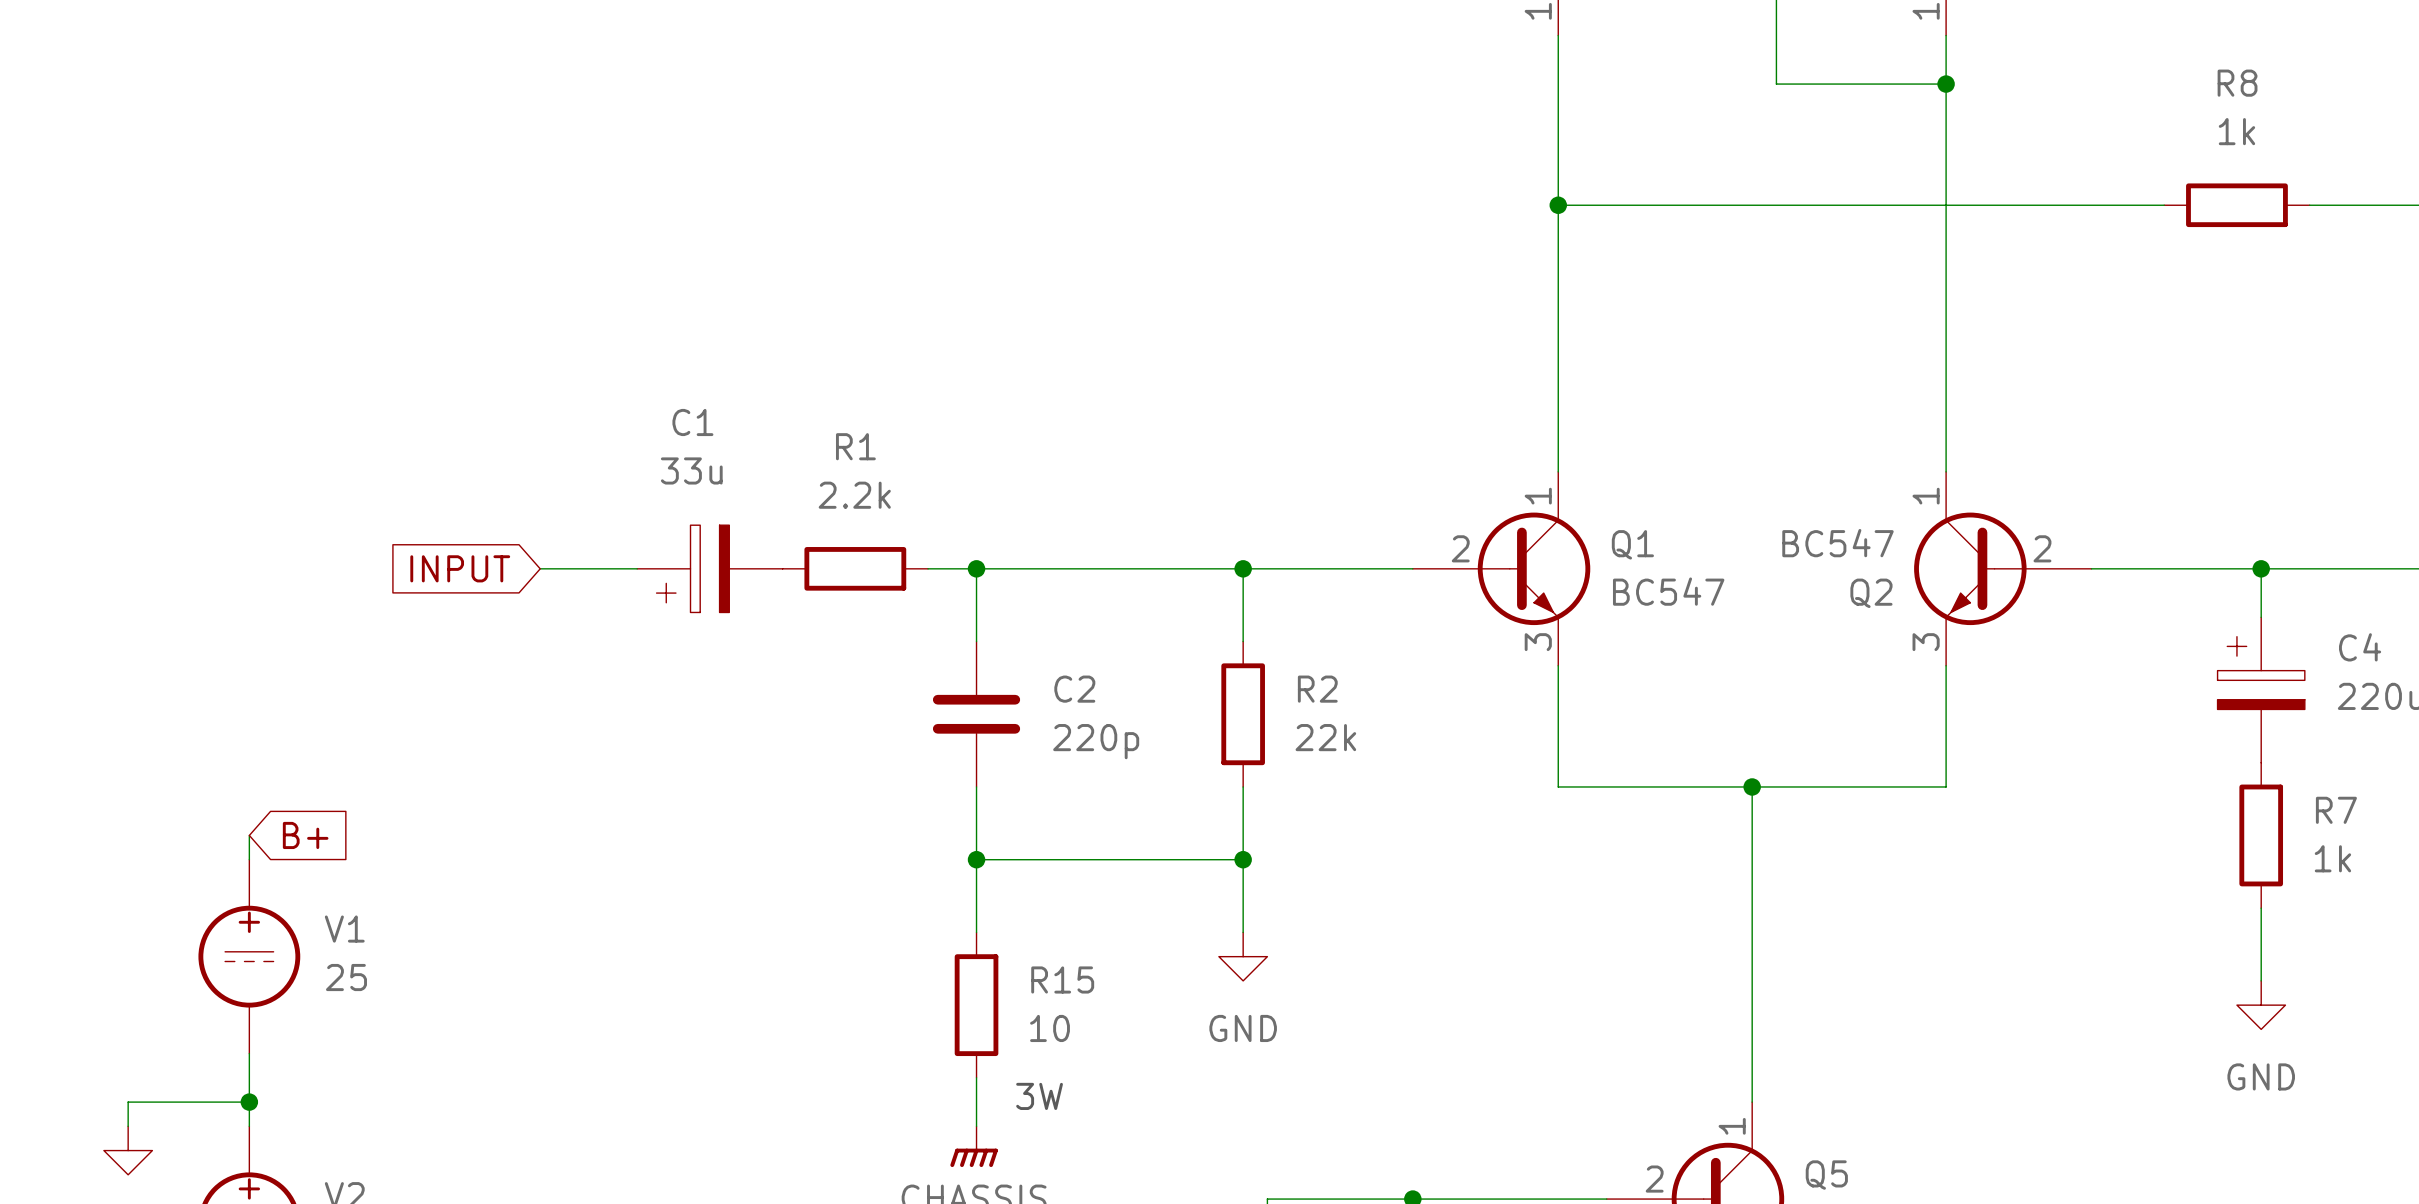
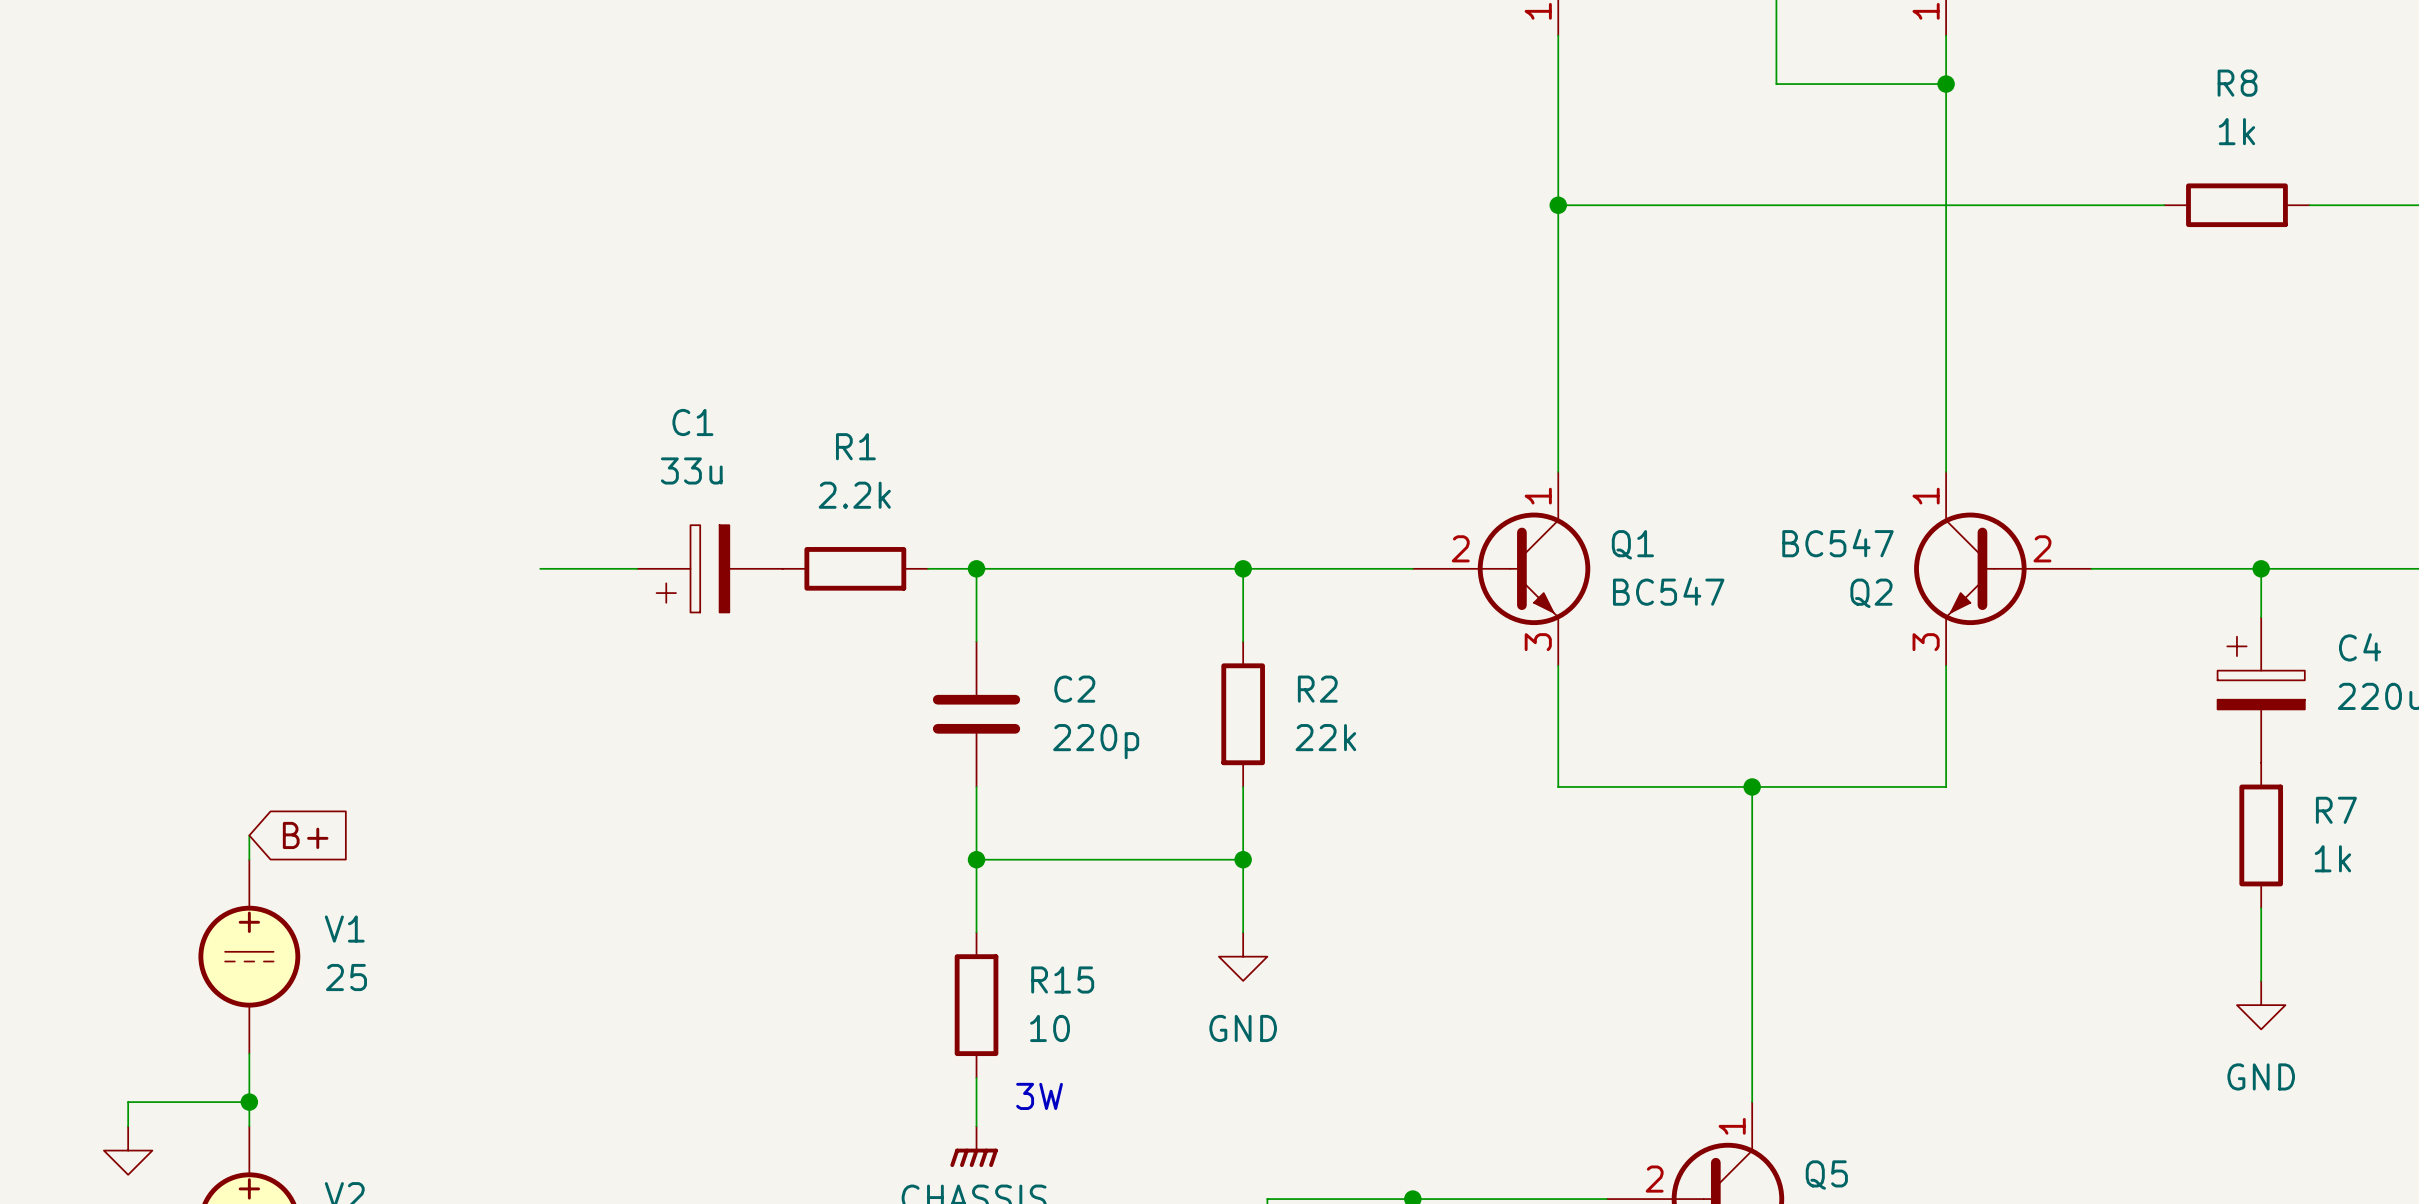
global label: INPUT (460, 568) -> none

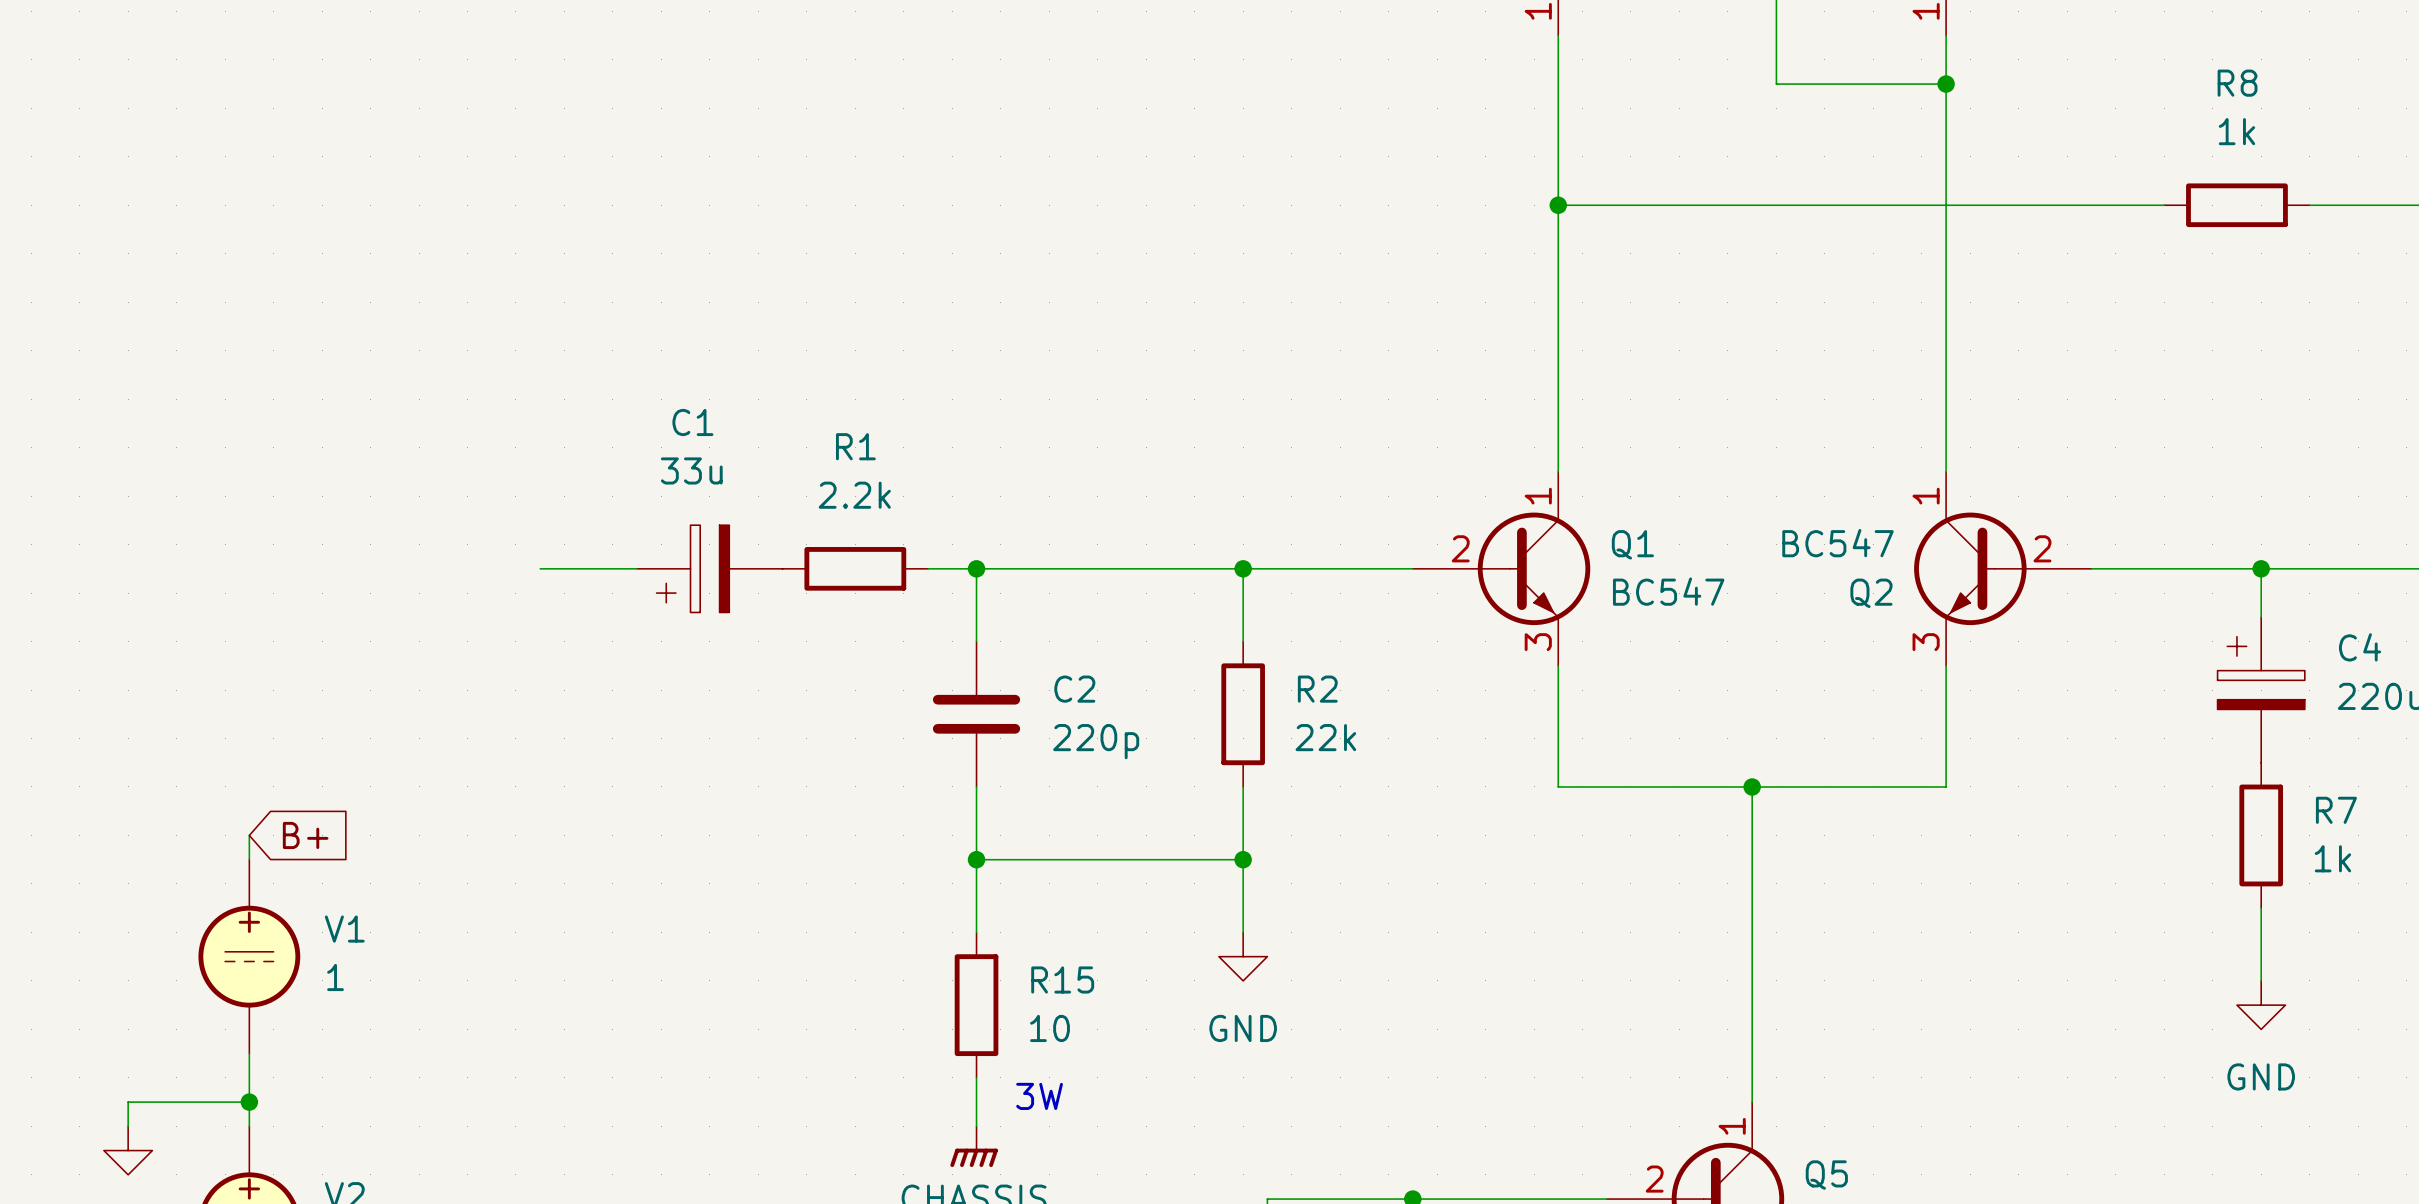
V1 value: 25 (346, 977) -> 1 (335, 977)

